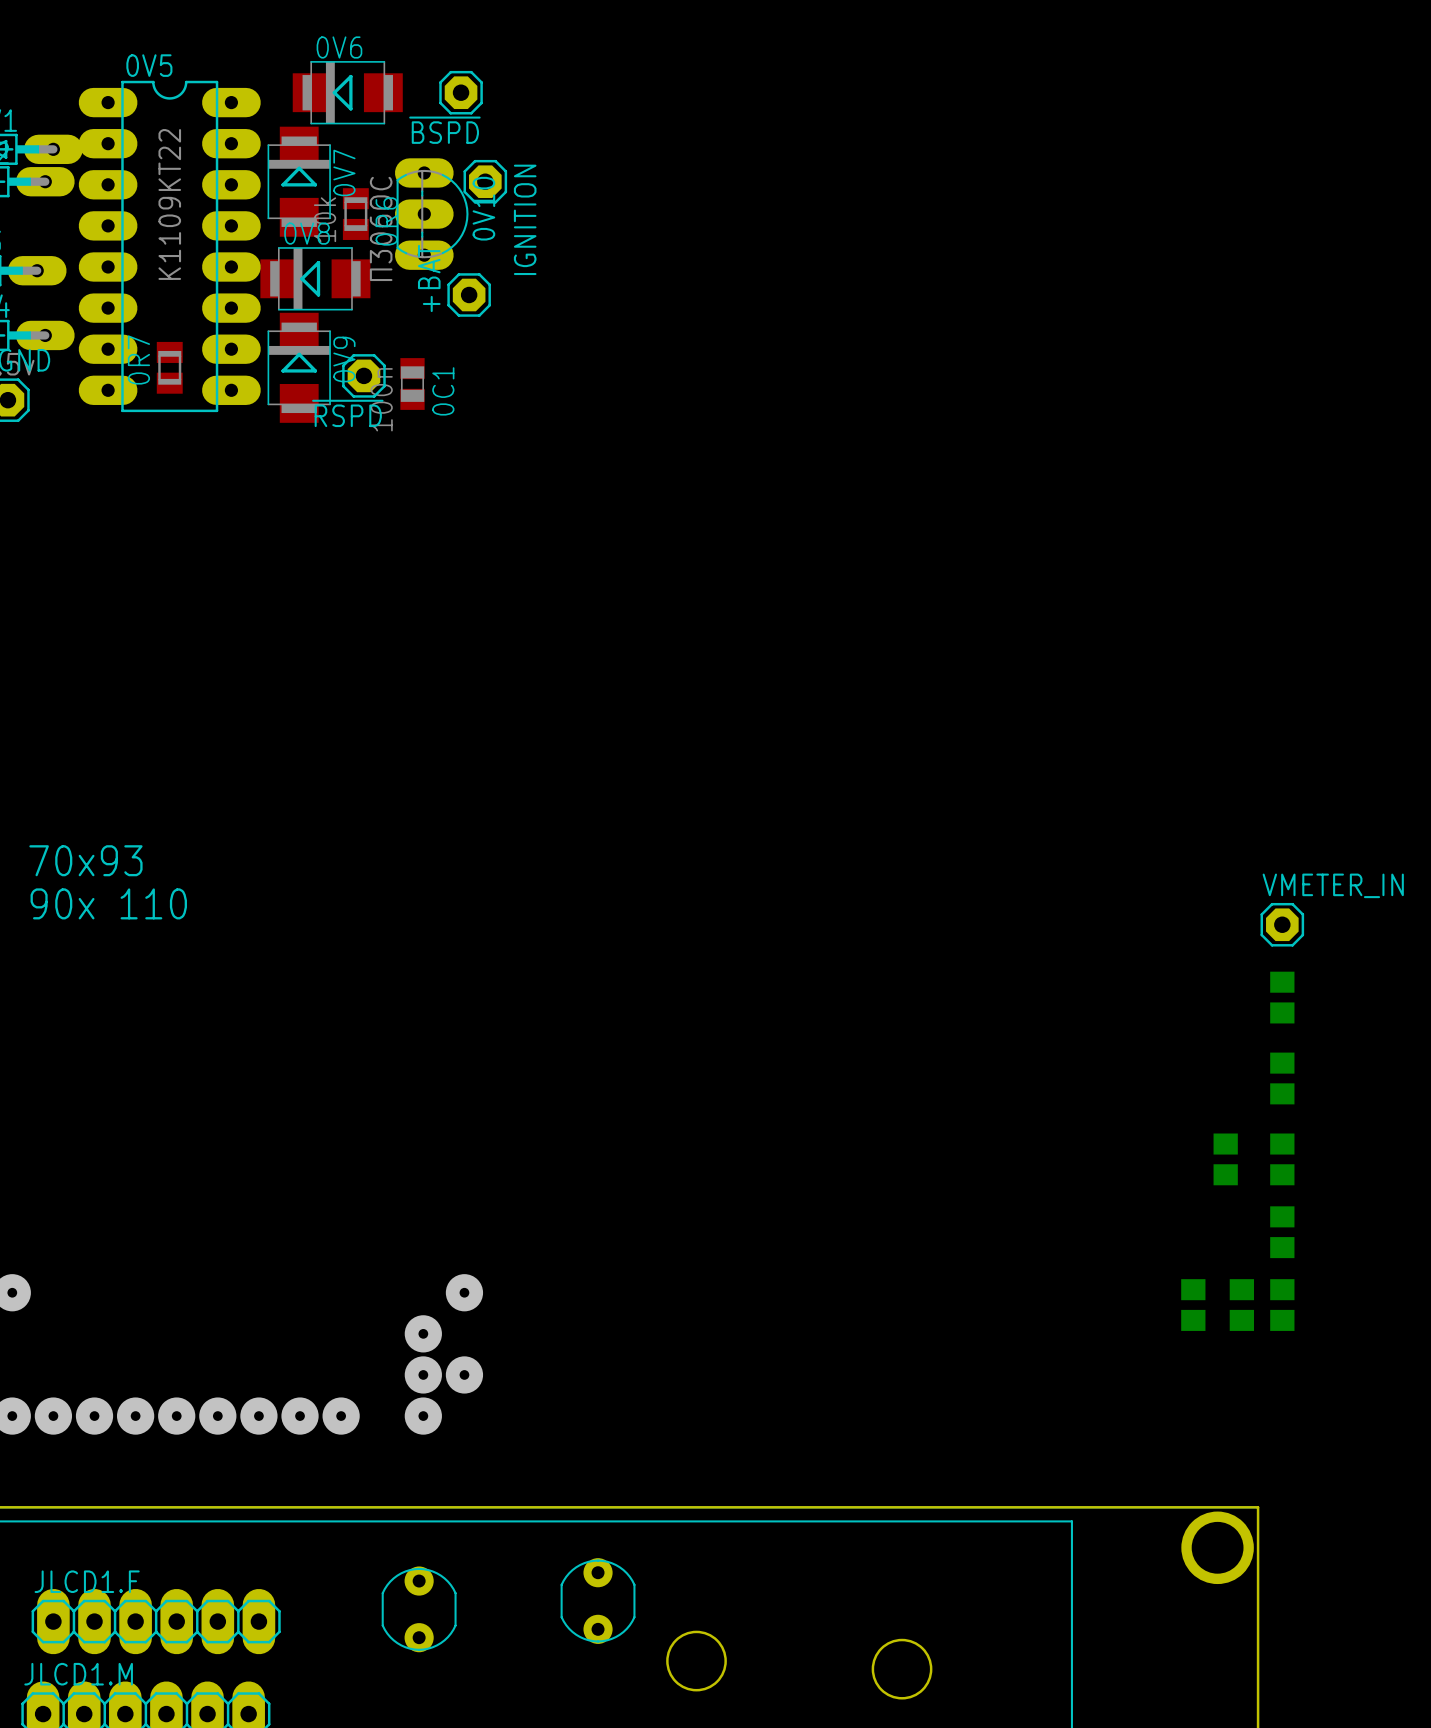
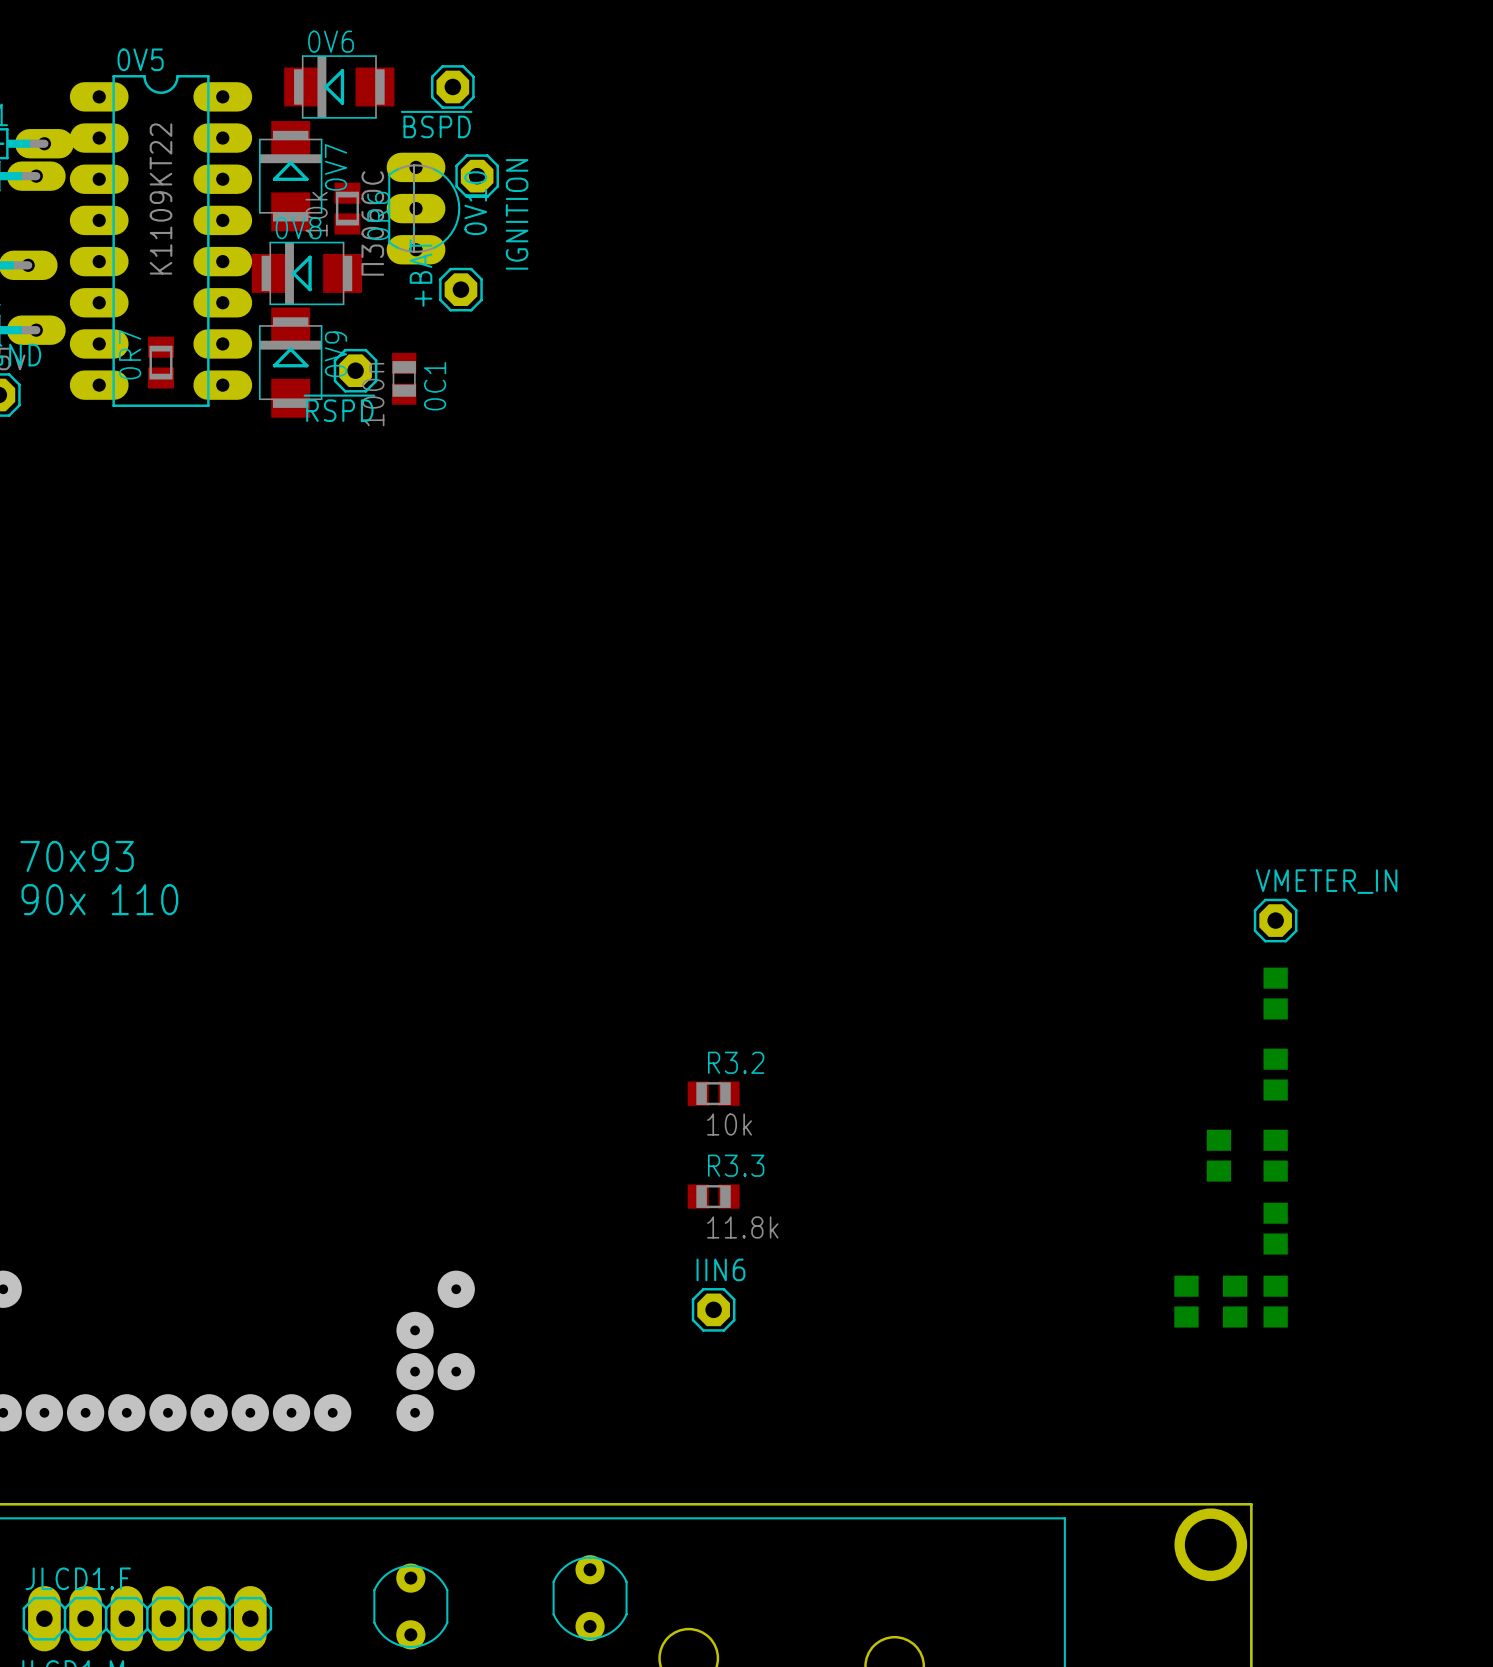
R3.2: none -> 10k (713, 1093)
R3.3: none -> 11.8k (713, 1196)
IIN6: none -> (713, 1309)

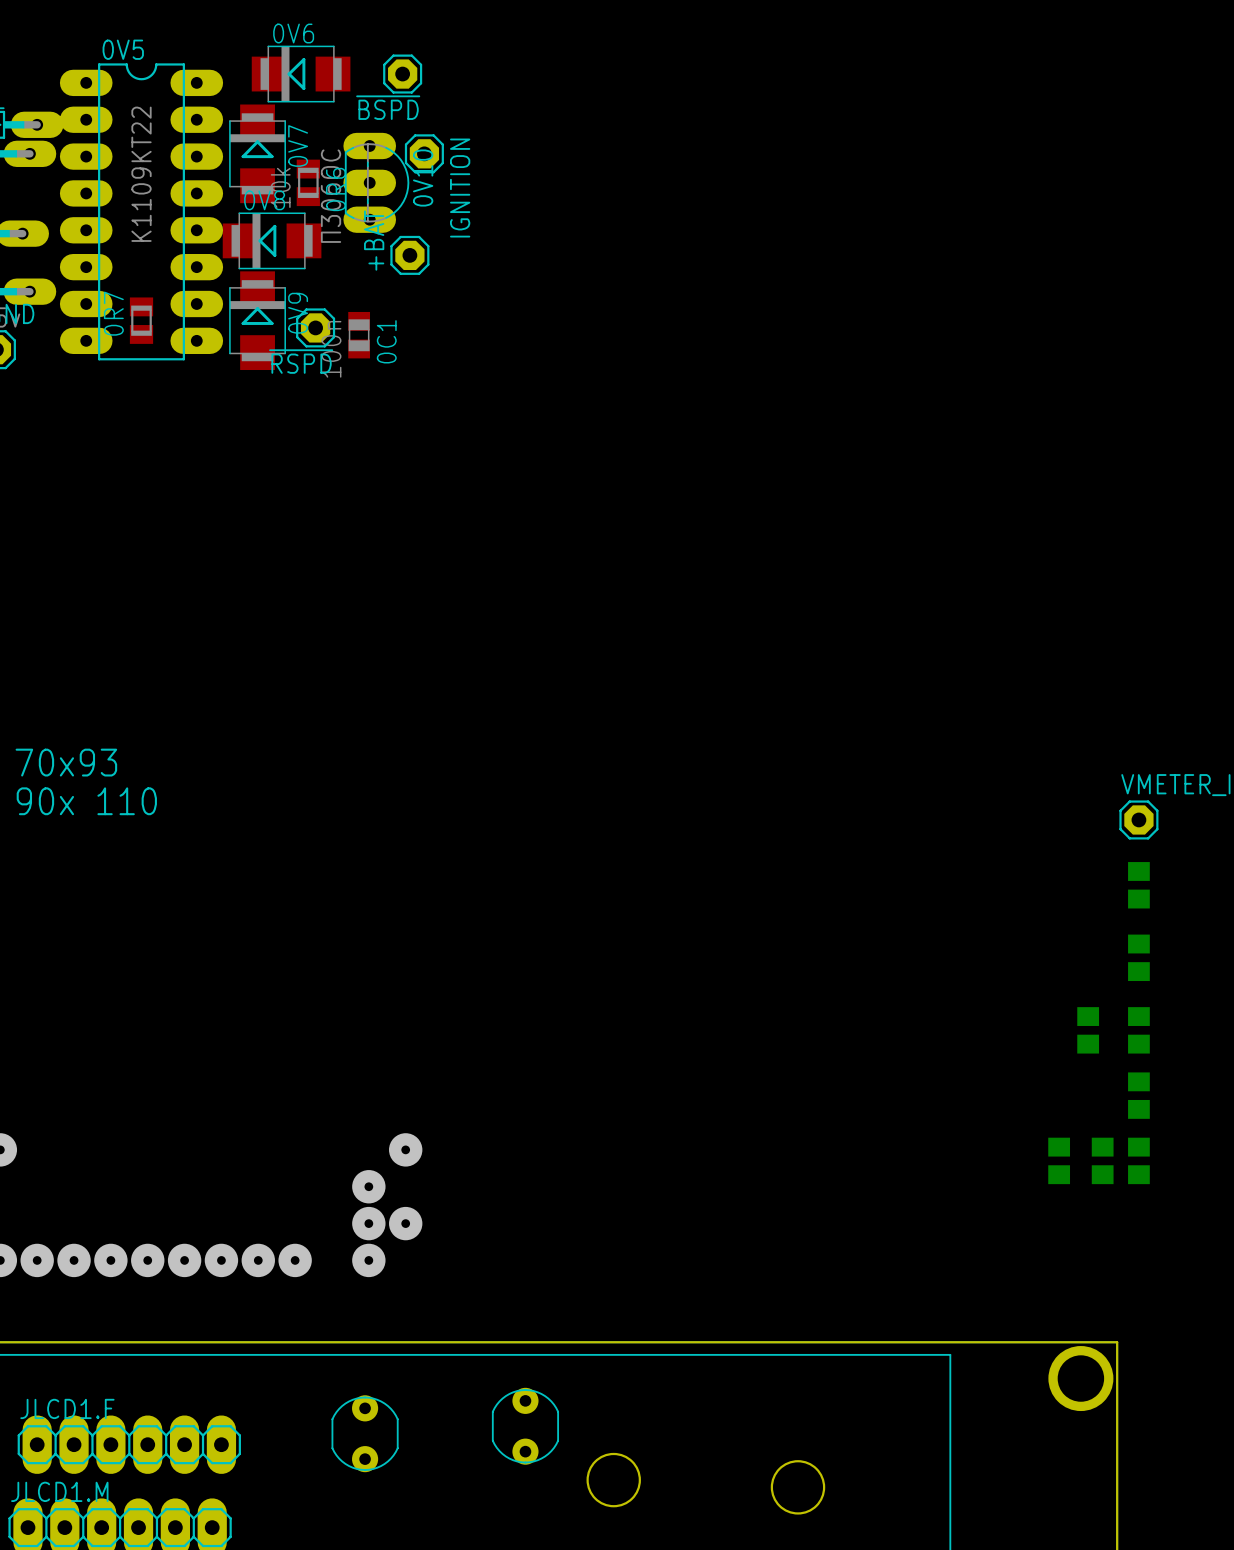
R3.2: 10k (713, 1093) -> none
R3.3: 11.8k (713, 1196) -> none
IIN6: (713, 1309) -> none

